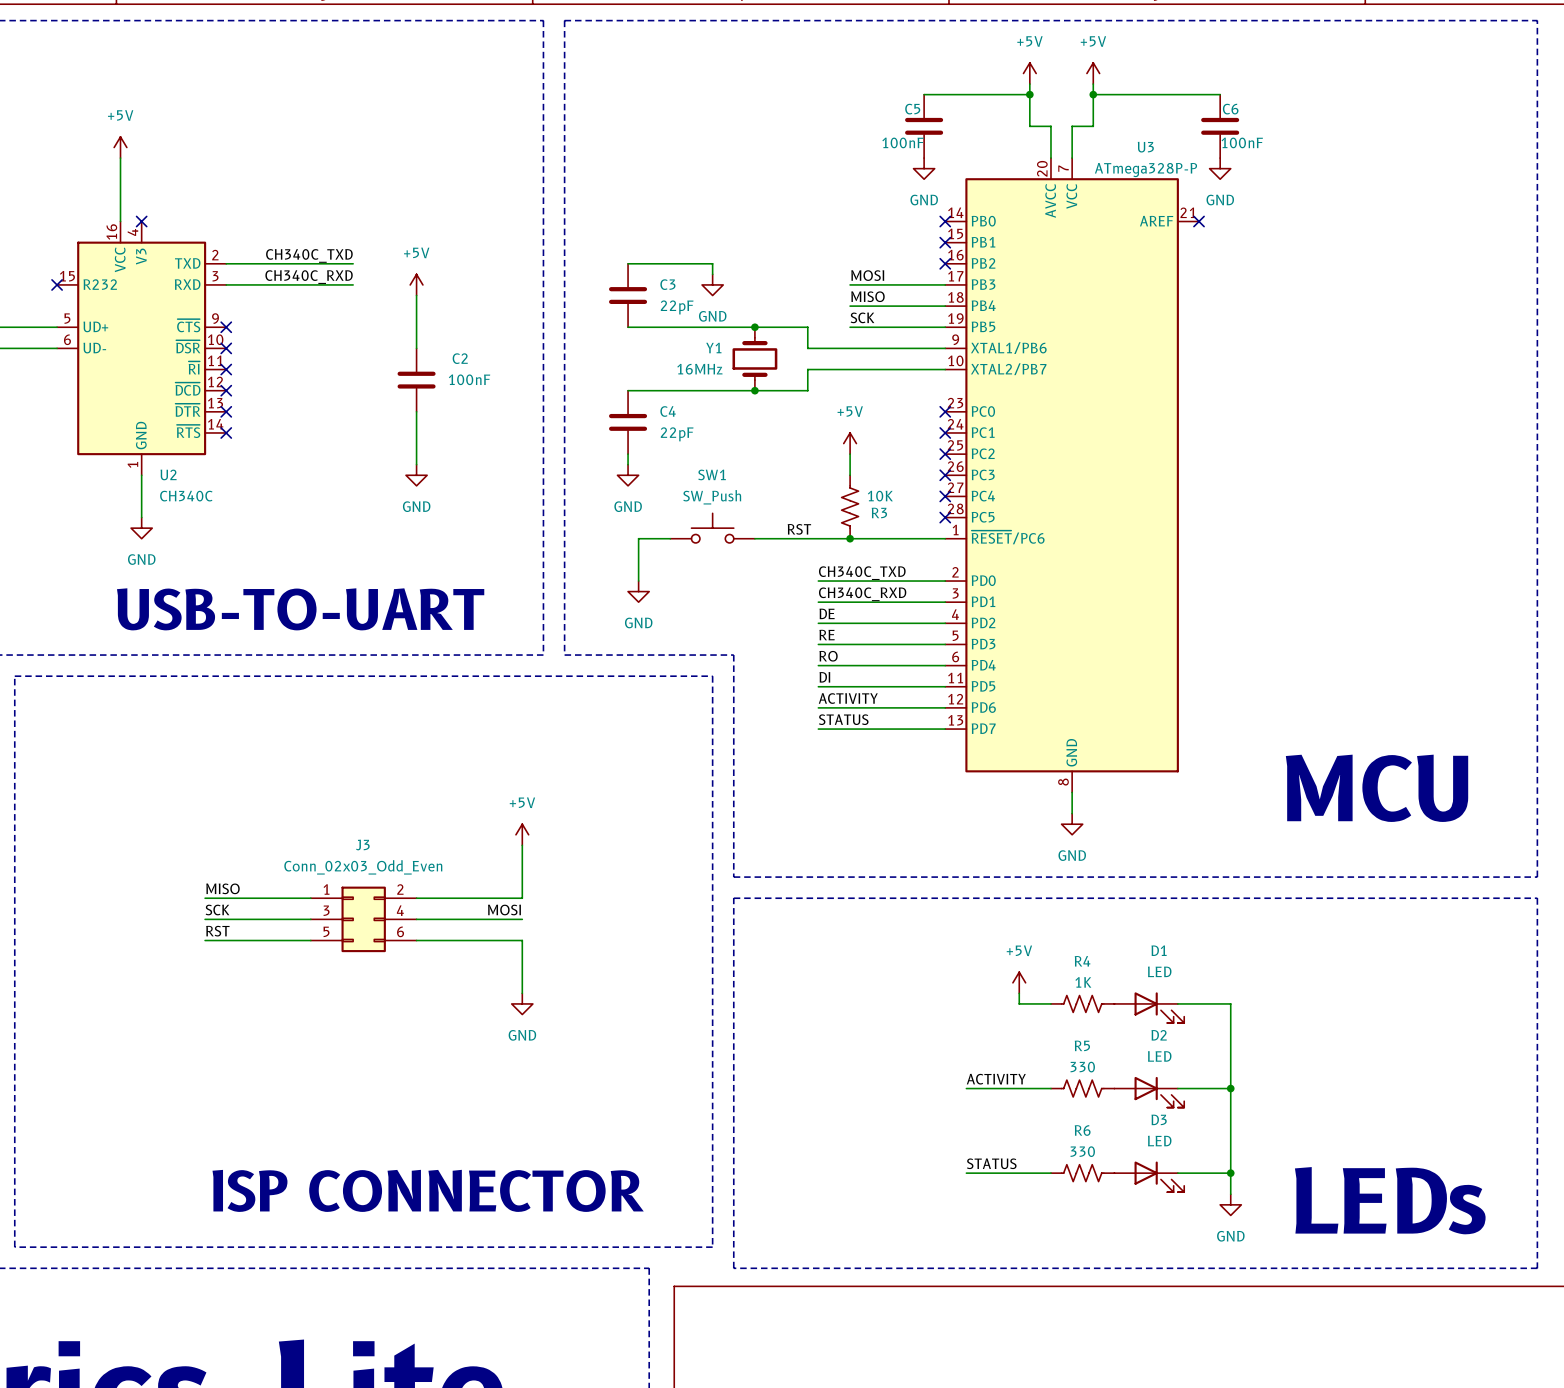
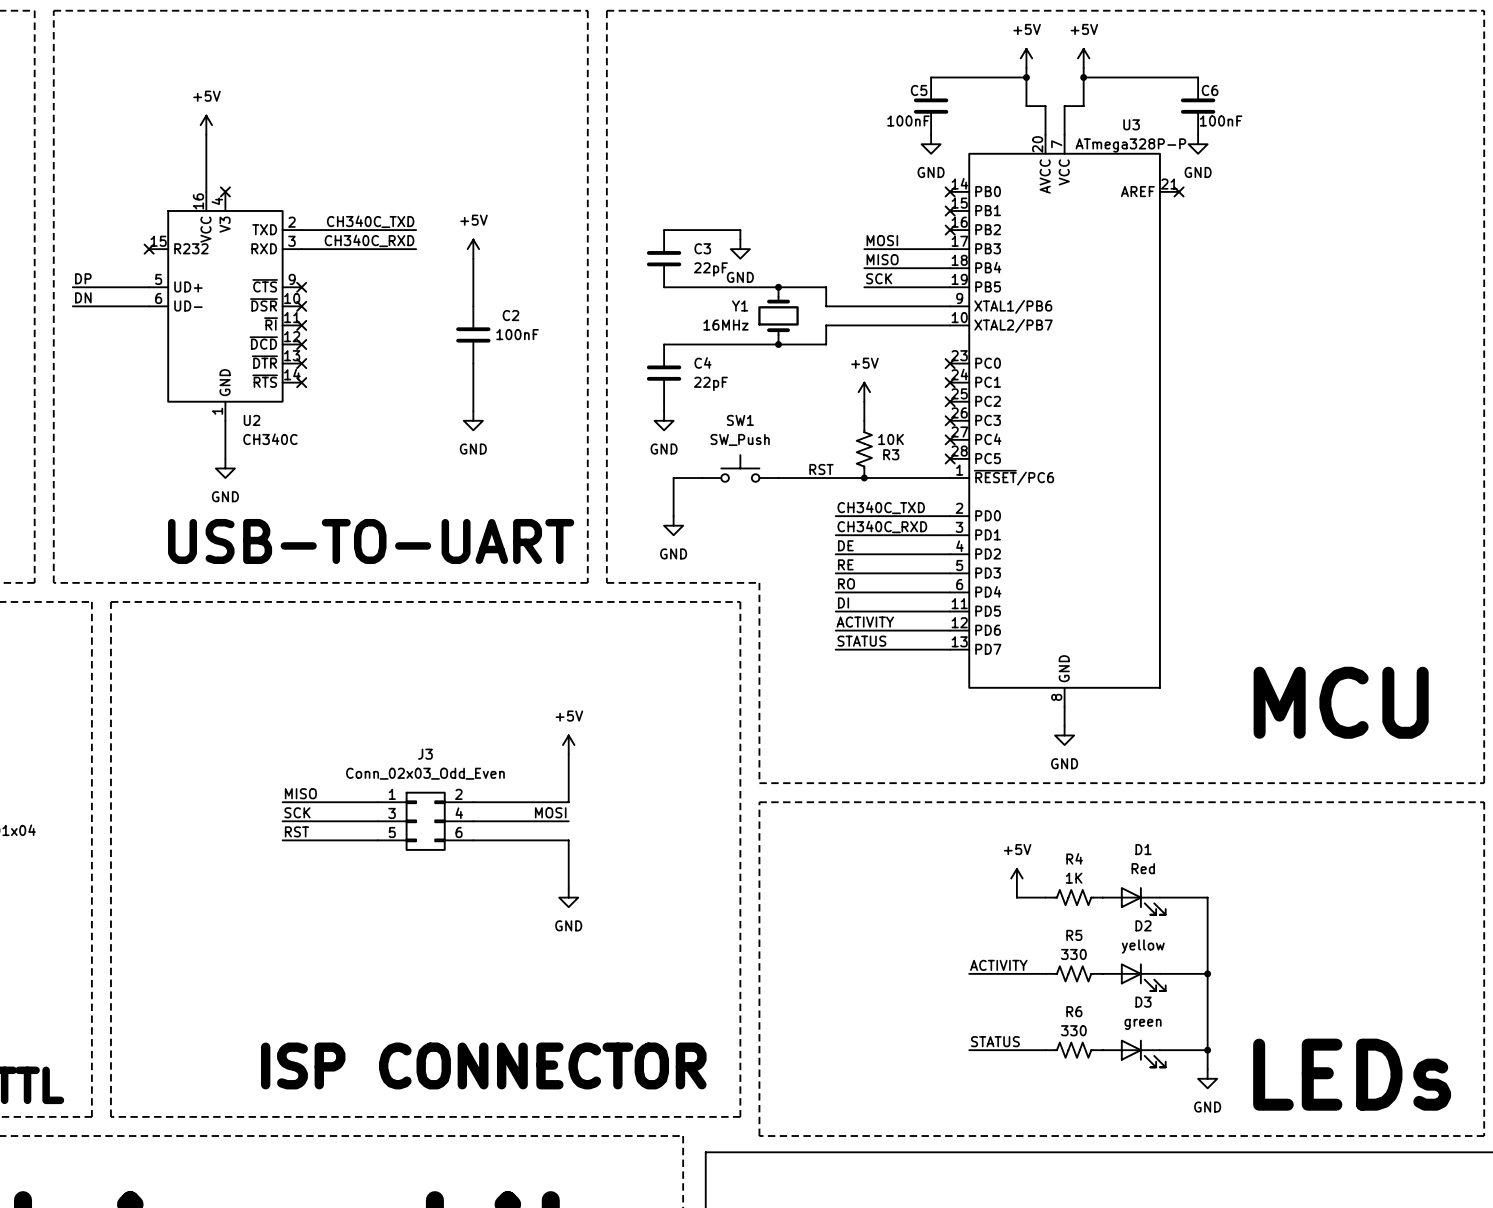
D1 value: LED (1159, 971) -> Red (1143, 868)
D2 value: LED (1159, 1056) -> yellow (1143, 946)
D3 value: LED (1159, 1141) -> green (1143, 1024)

